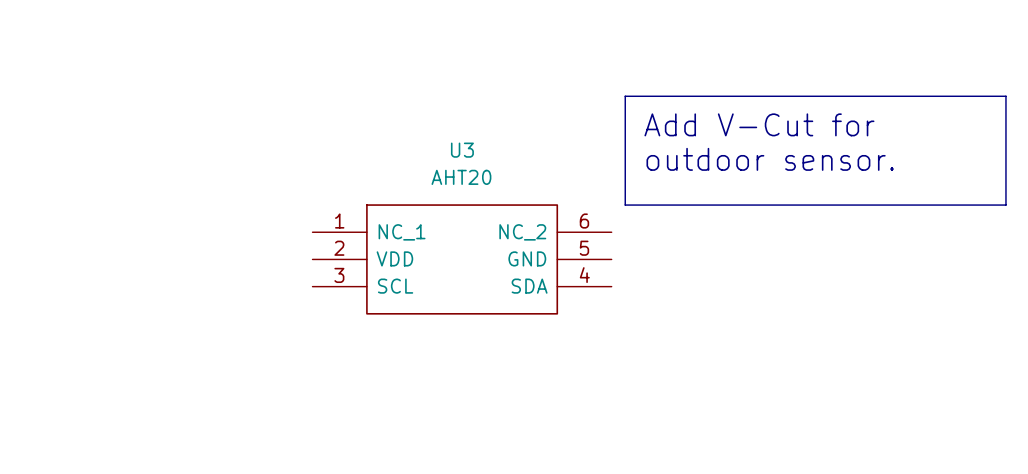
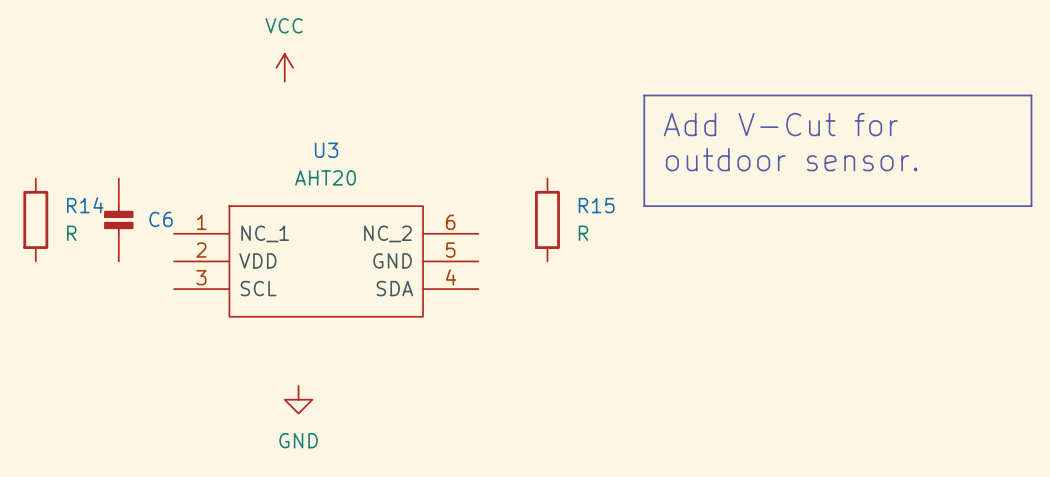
power symbol: none -> VCC (284, 67)
R14: none -> R (35, 219)
C6: none -> (118, 219)
R15: none -> R (547, 219)
U3 position: (462, 259) -> (326, 261)
power symbol: none -> GND (298, 399)

